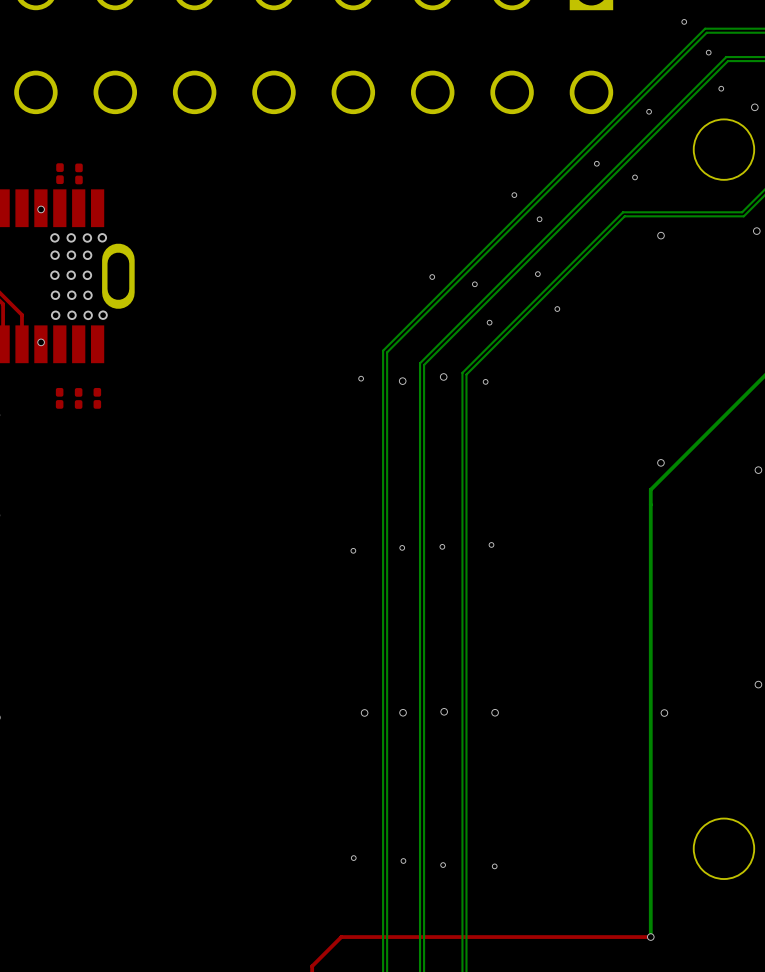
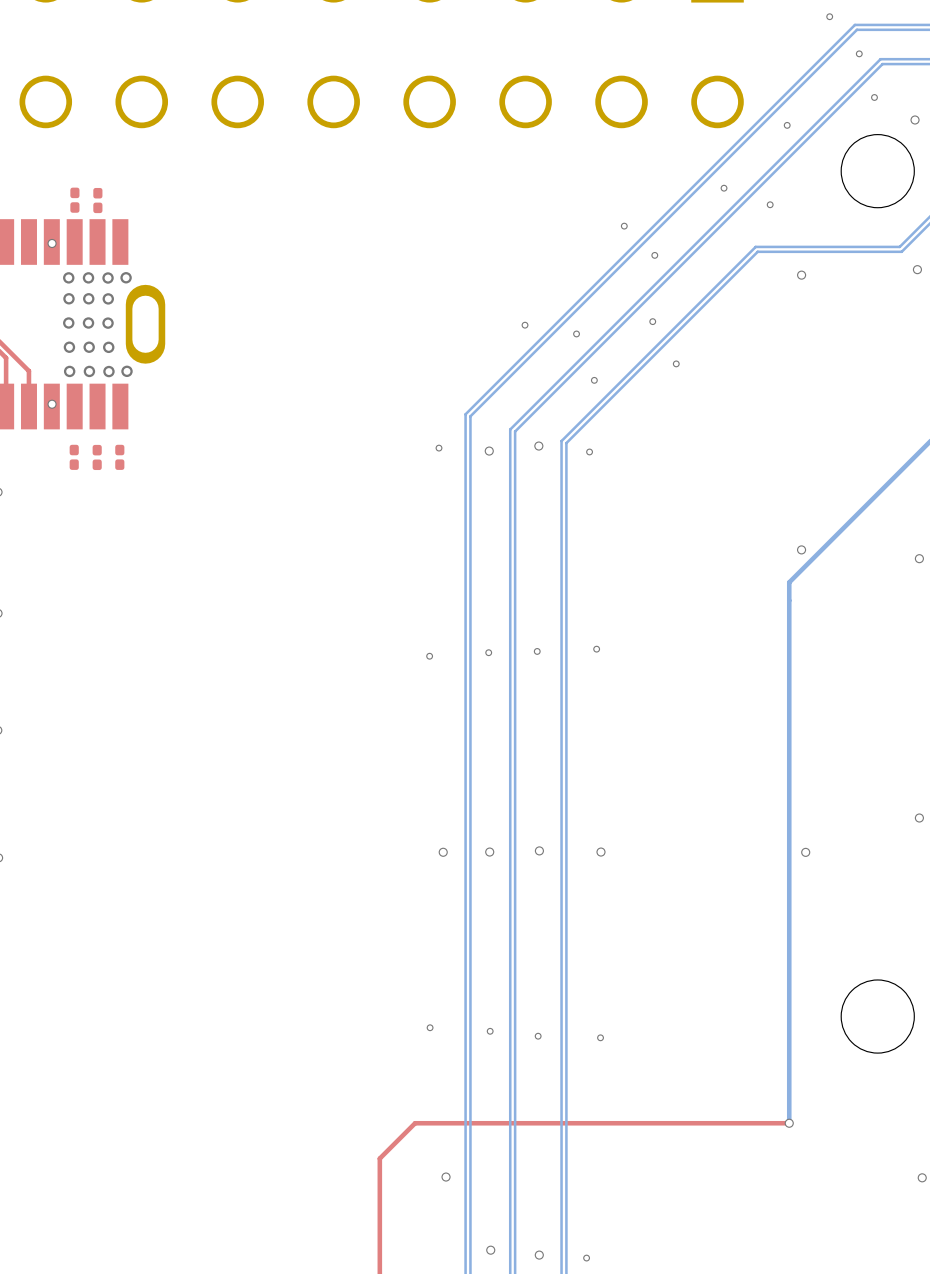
part: none -> (74, 457)
part: none -> (97, 457)
part: none -> (119, 457)
part: (59, 398) -> none
part: (78, 398) -> none
part: (97, 398) -> none

